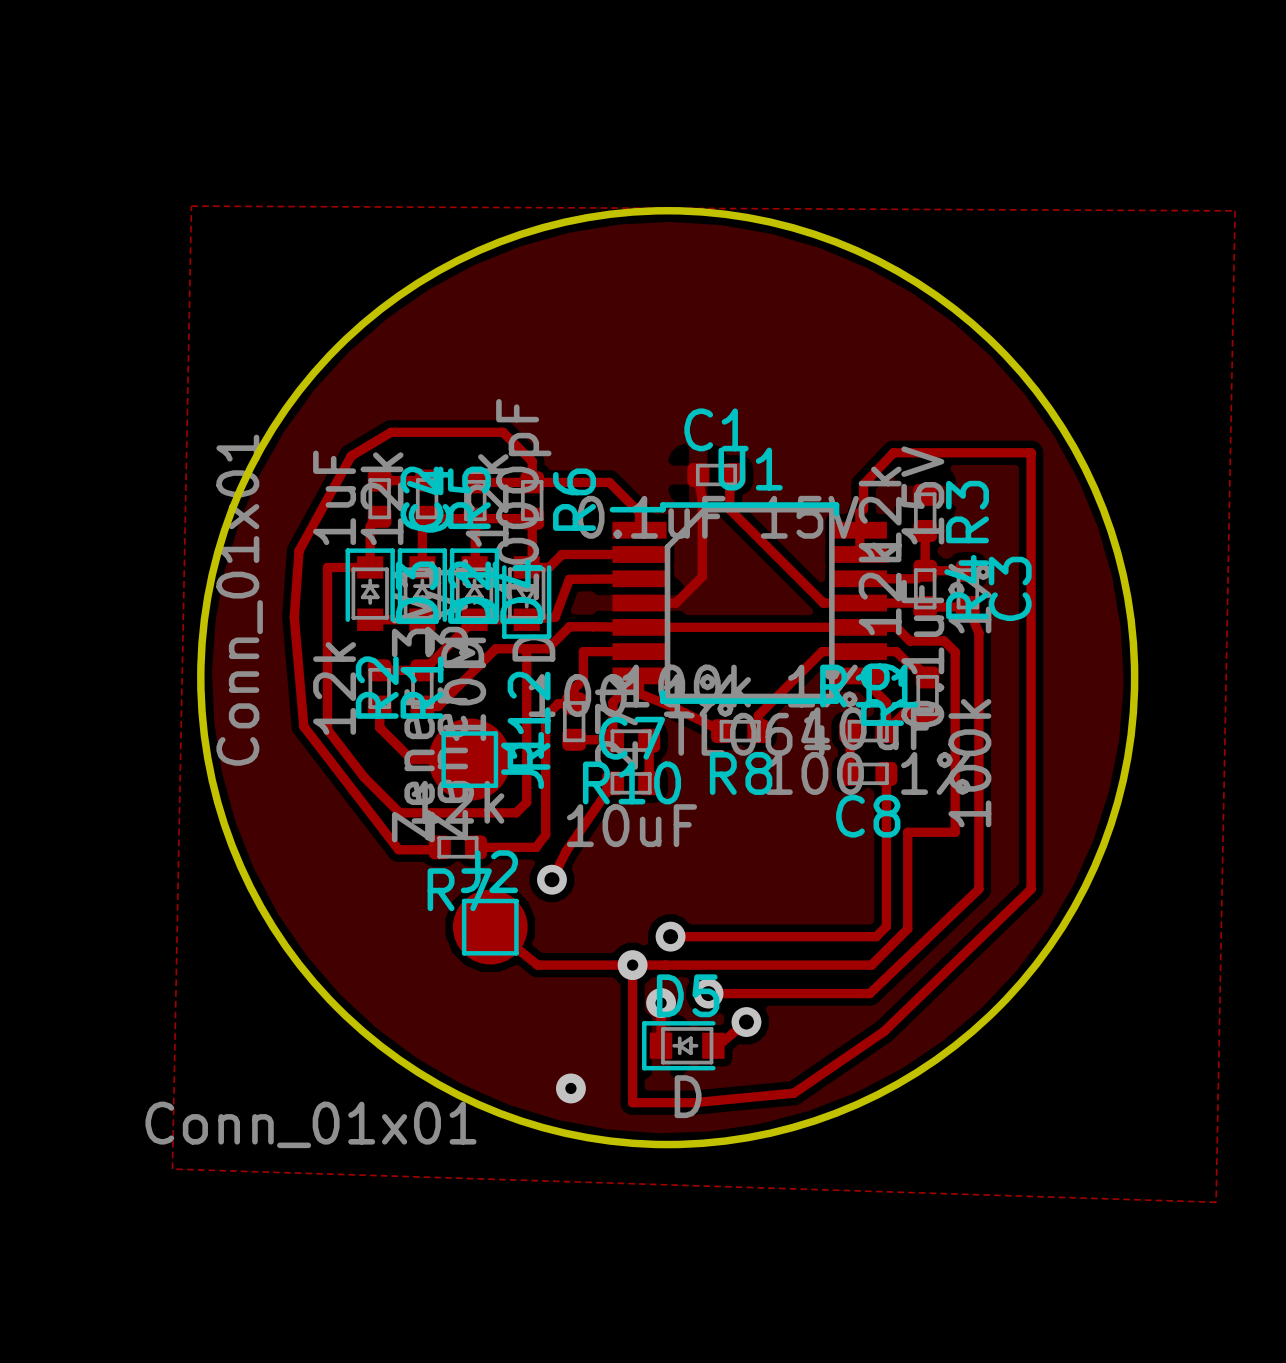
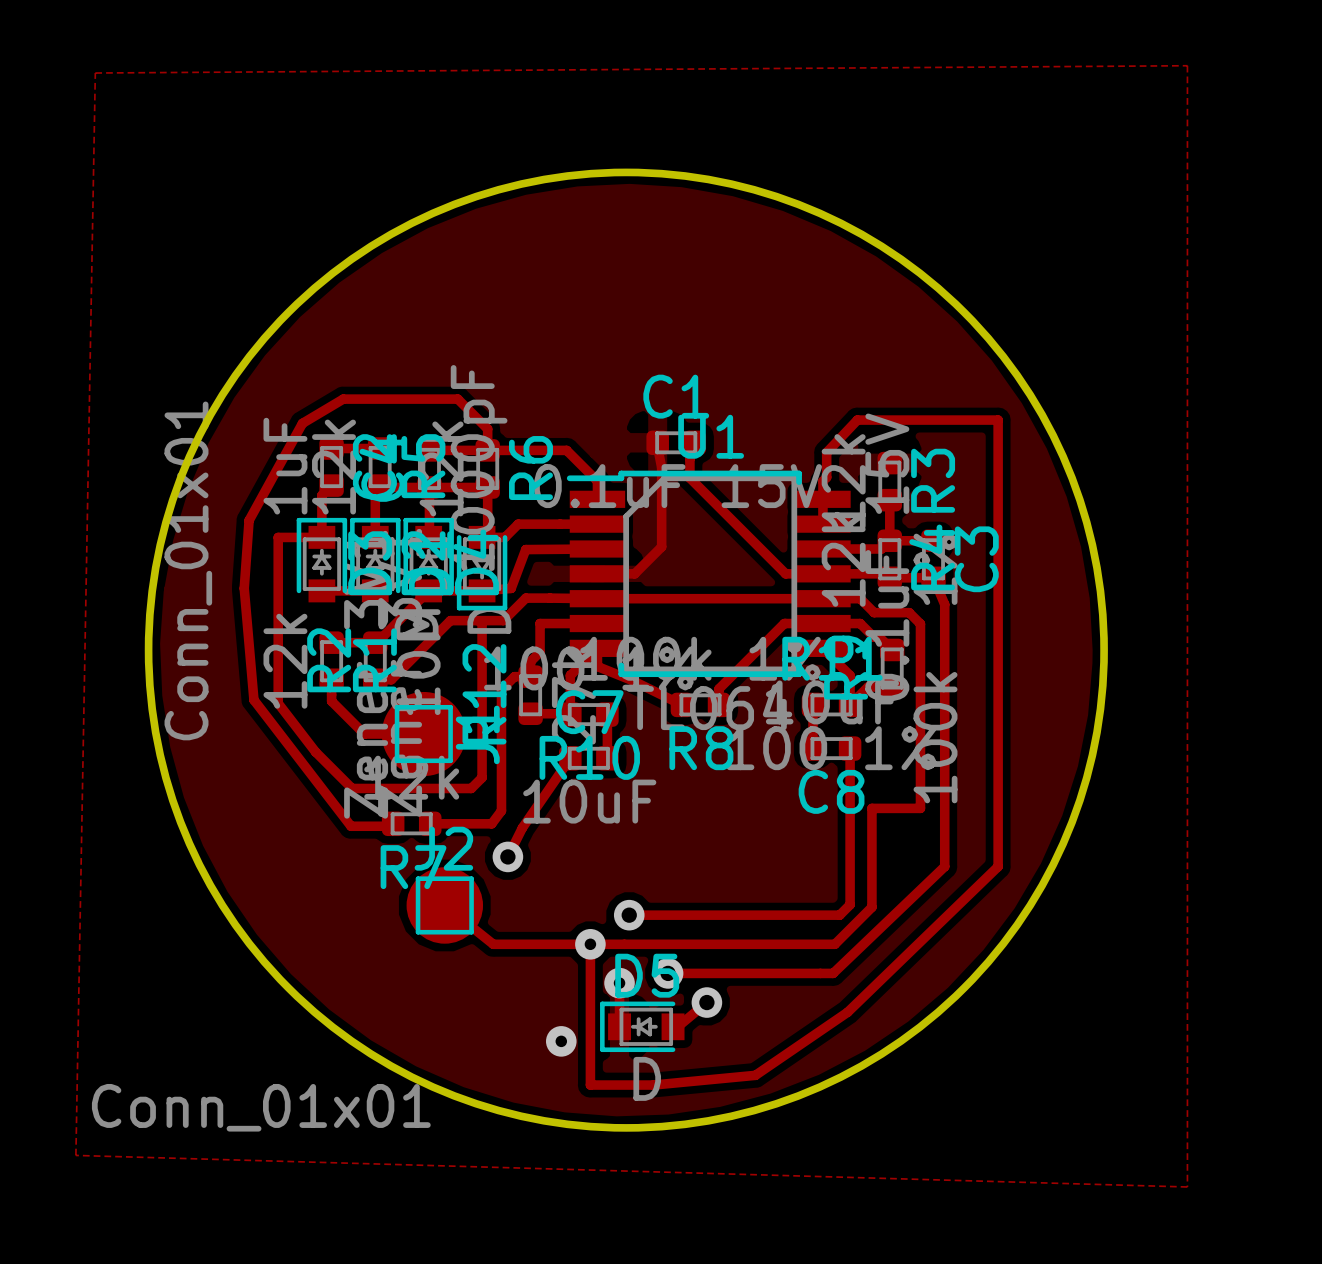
zone outline: (191, 206) (1235, 210) (1216, 1202) (172, 1169) (191, 206) -> (1187, 65) (95, 73) (75, 1155) (1187, 1186) (1187, 65)
via position: (570, 1088) -> (561, 1041)

